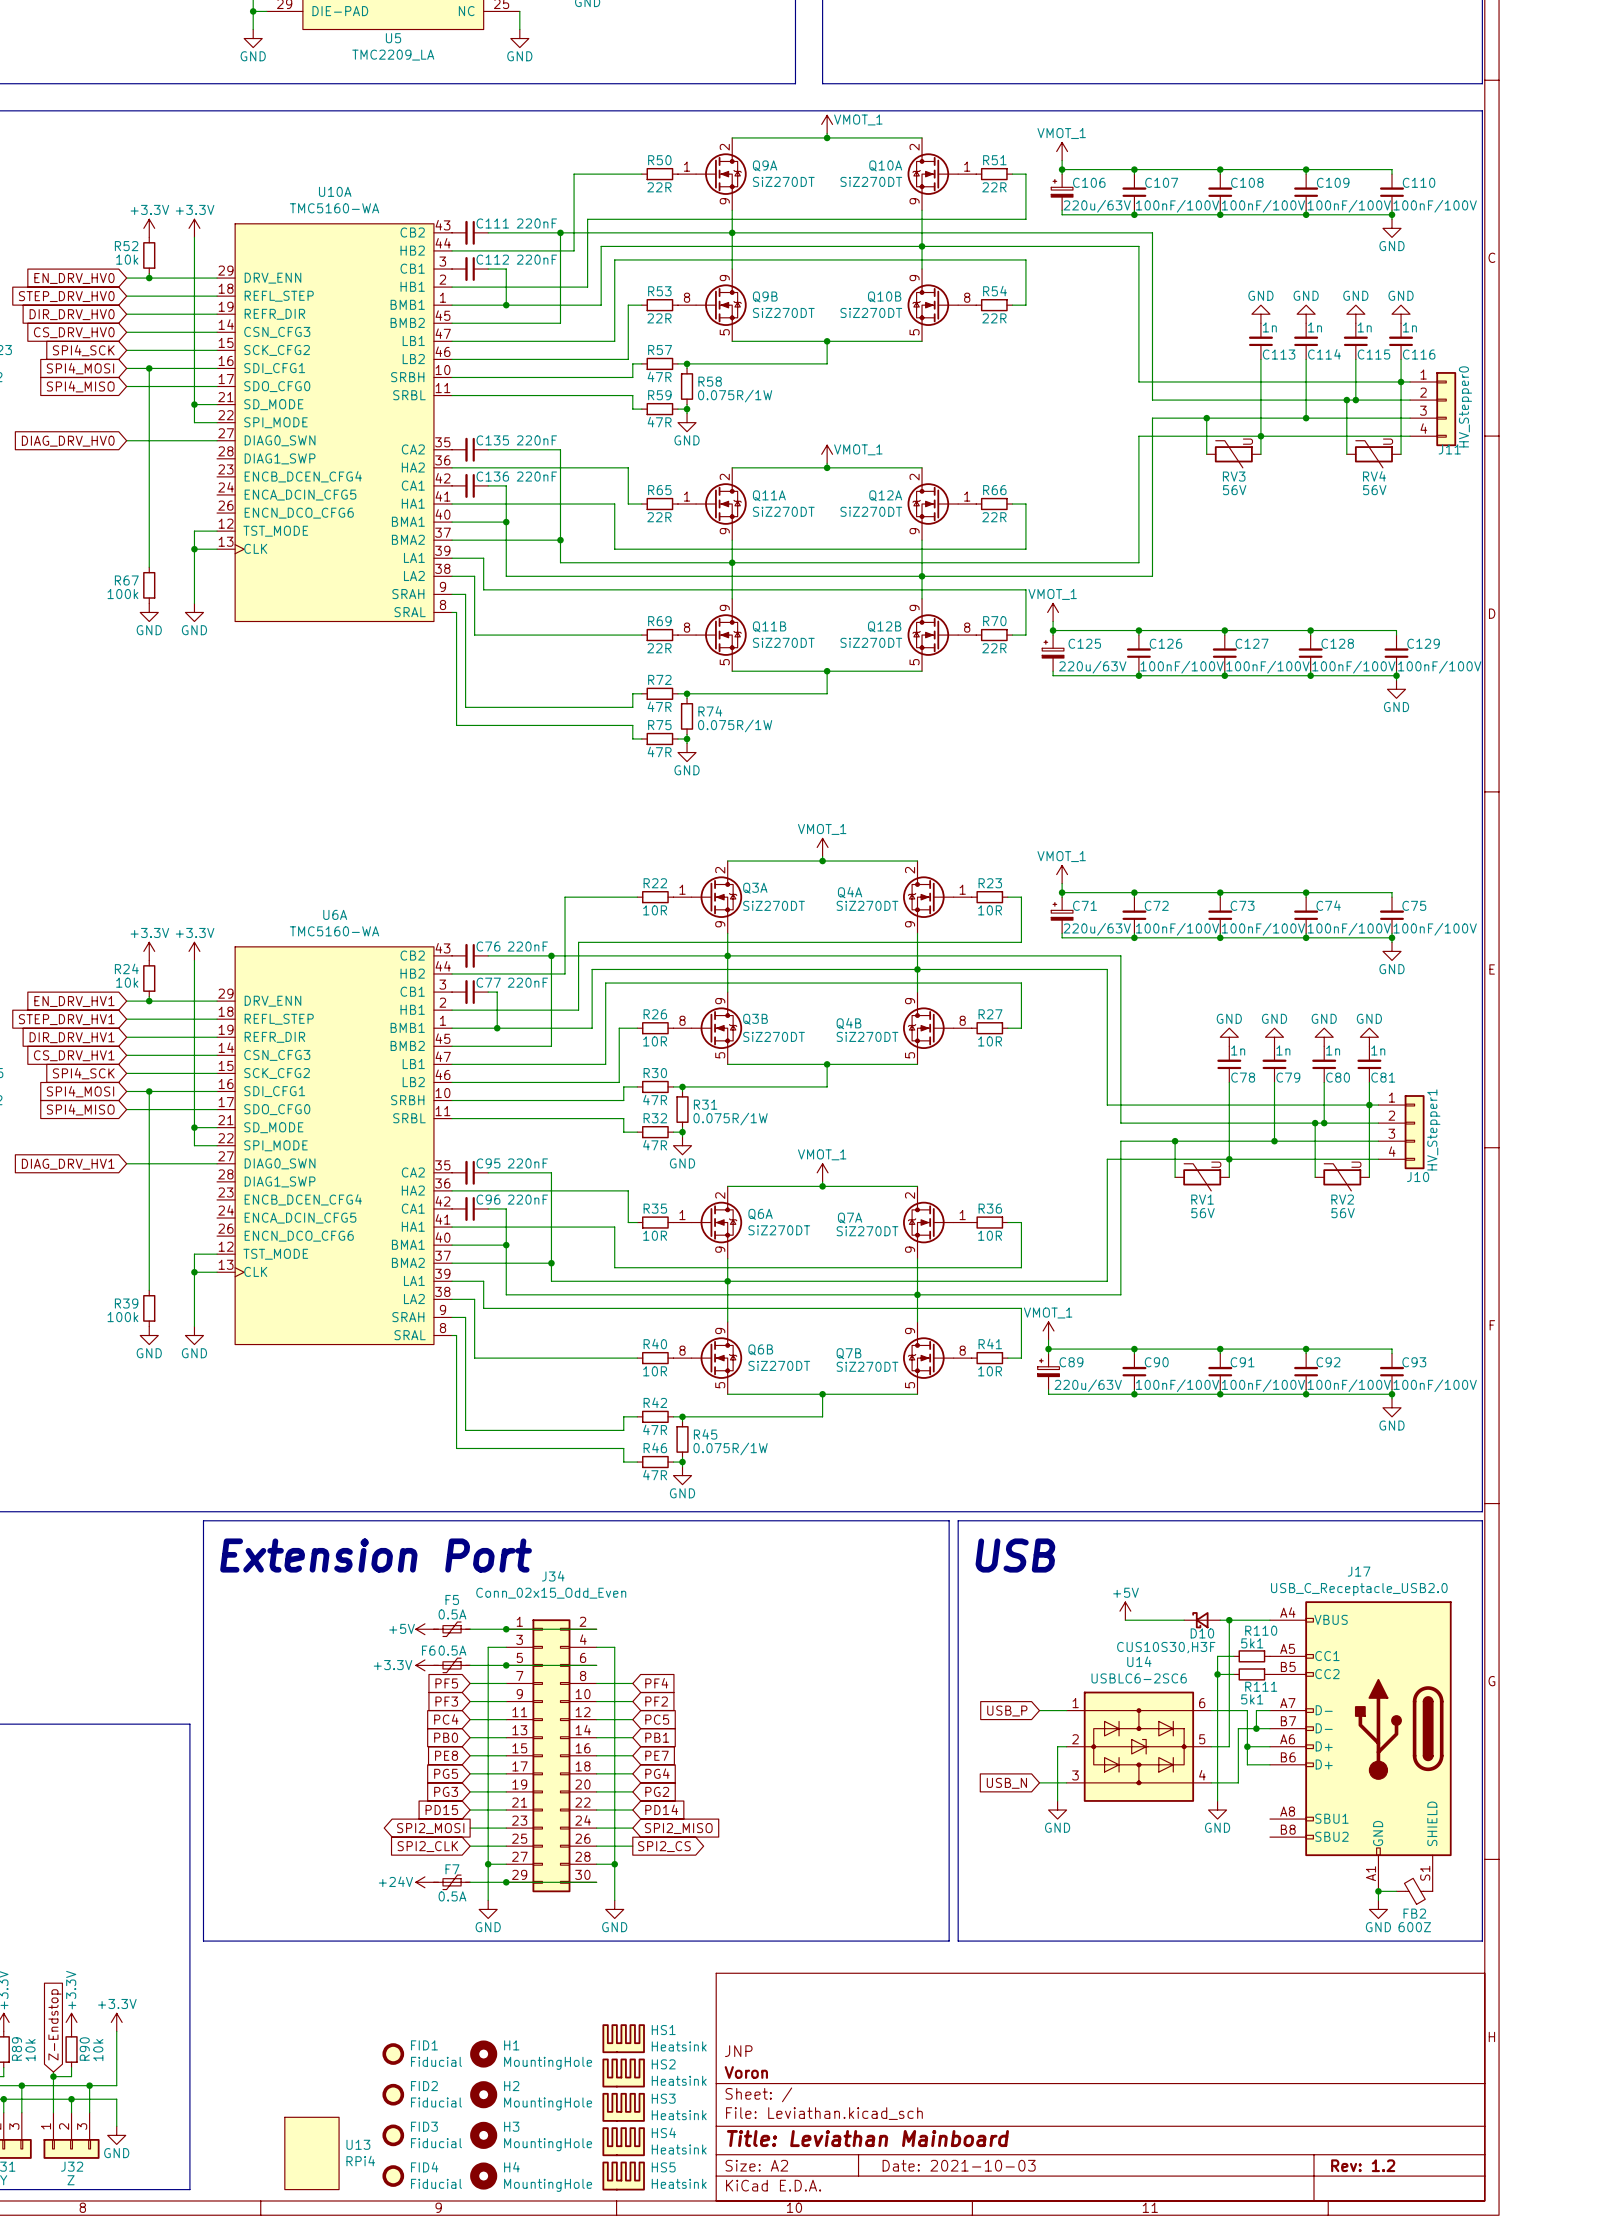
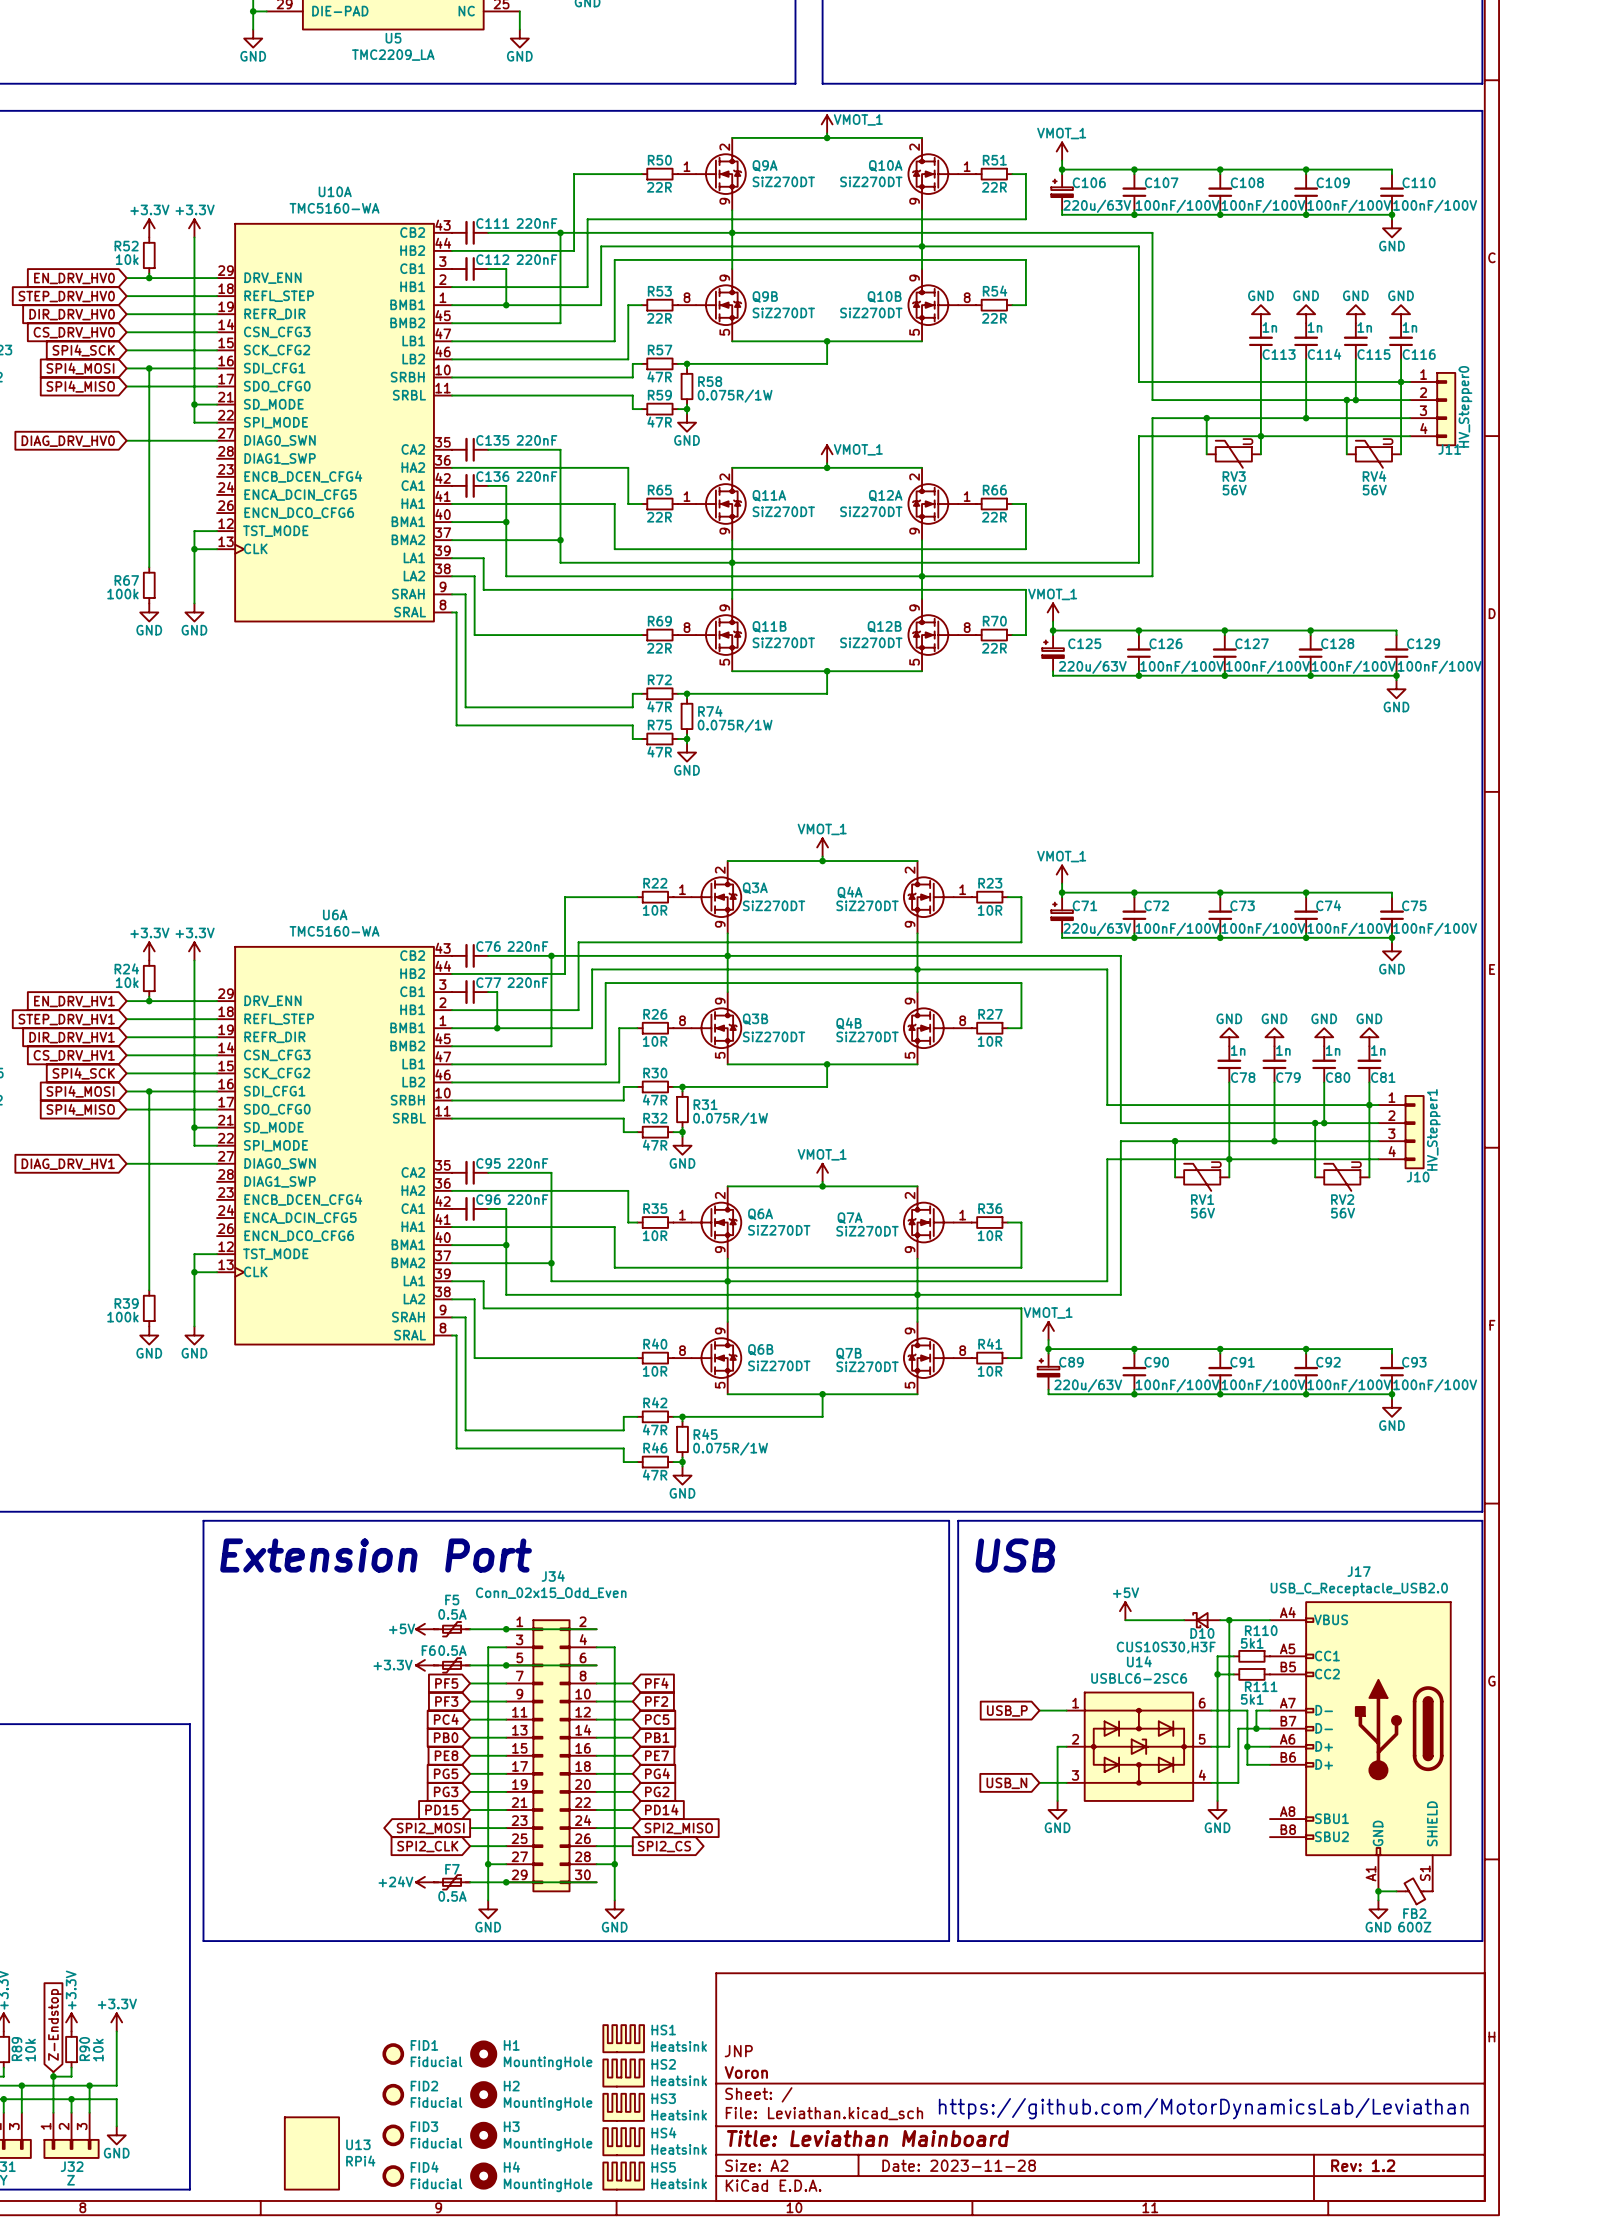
text: none -> https://github.com/MotorDynamicsLab/Leviathan (1203, 2108)
title block: Date: 2021-10-03 (959, 2165) -> Date: 2023-11-28 (959, 2165)

